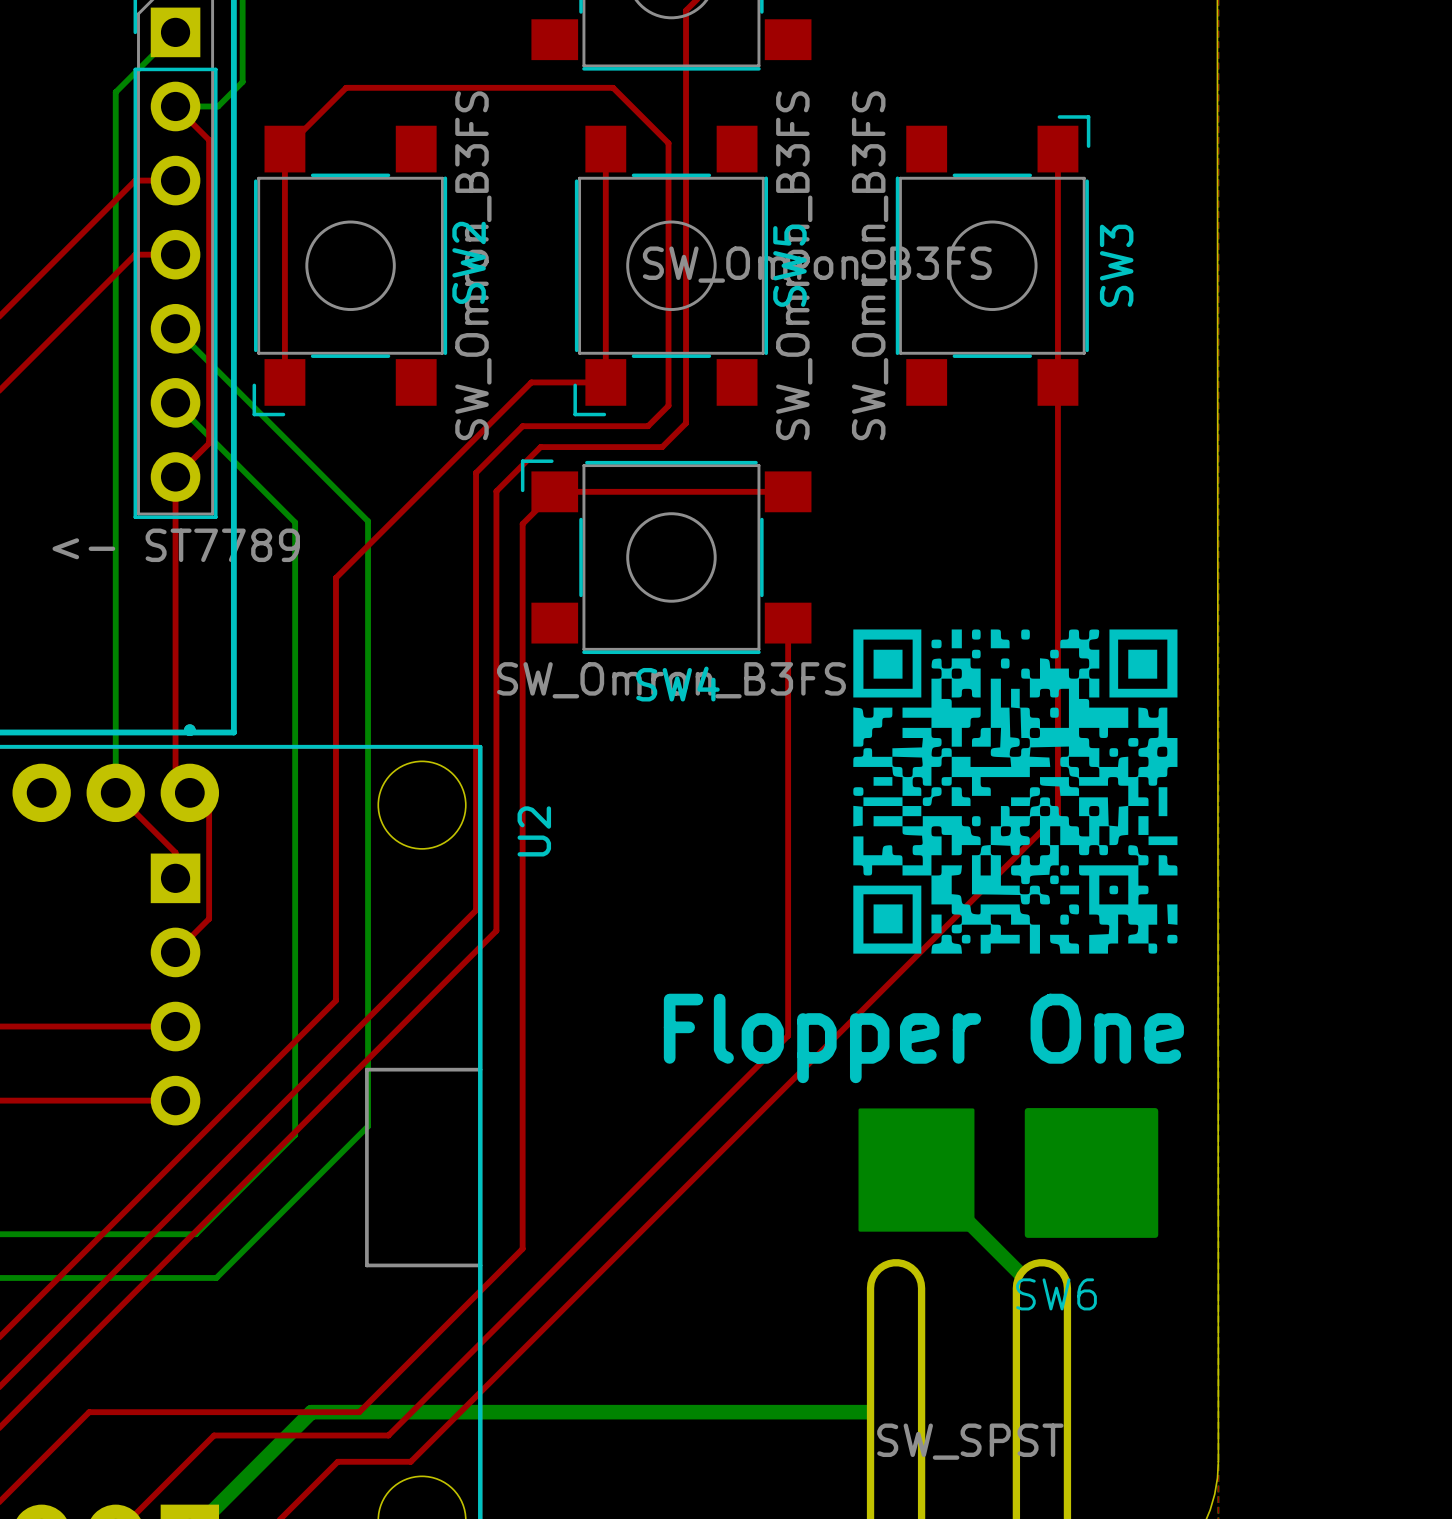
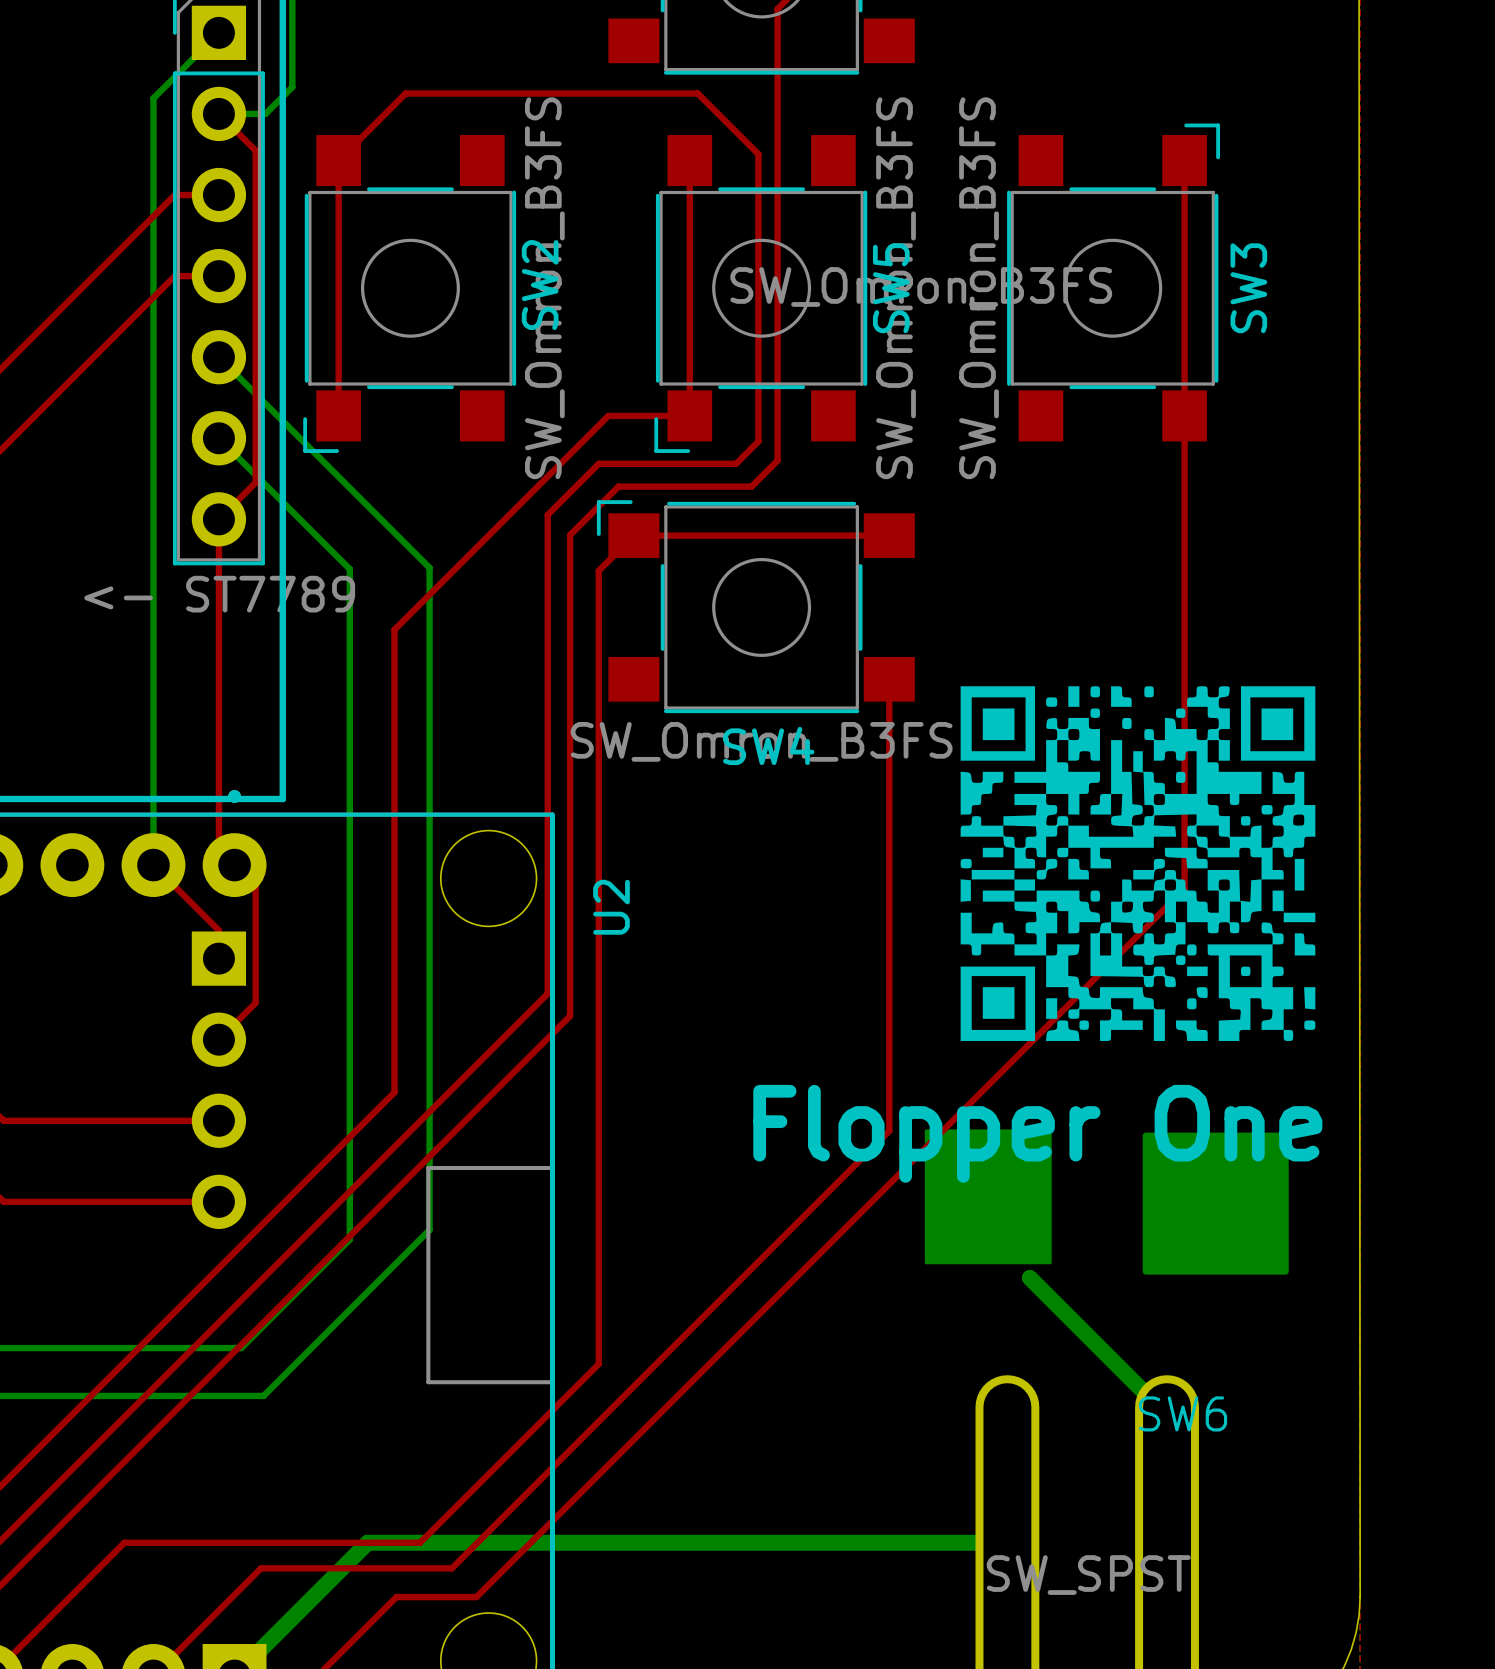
drawing position: (916, 1170) -> (988, 1196)
drawing position: (1091, 1172) -> (1215, 1203)

